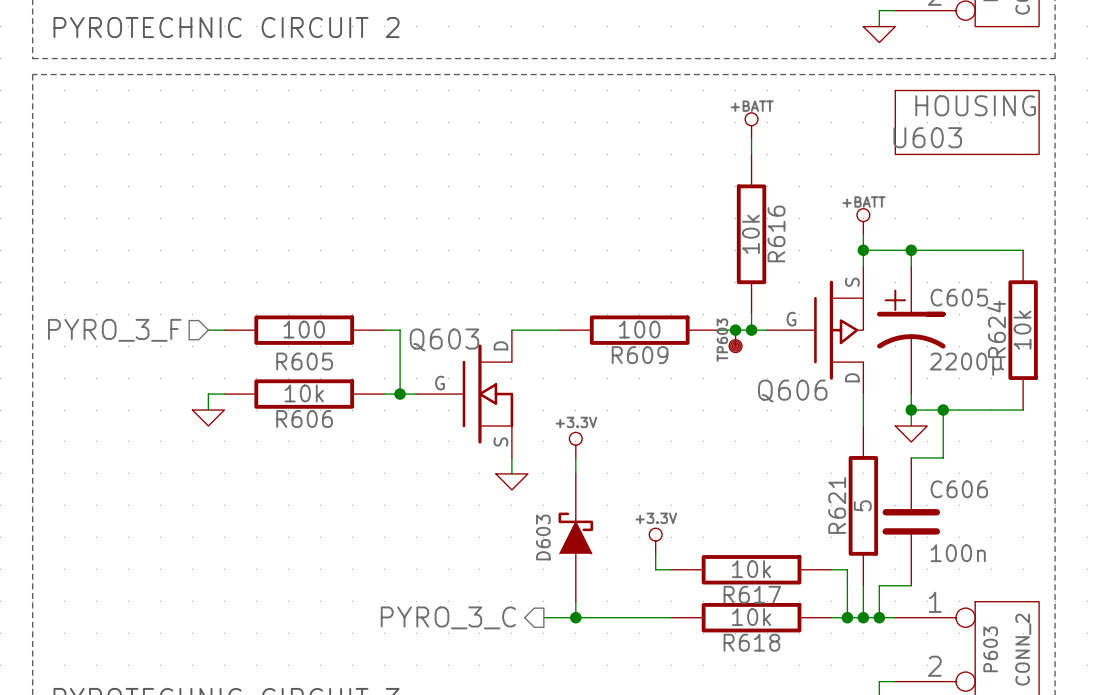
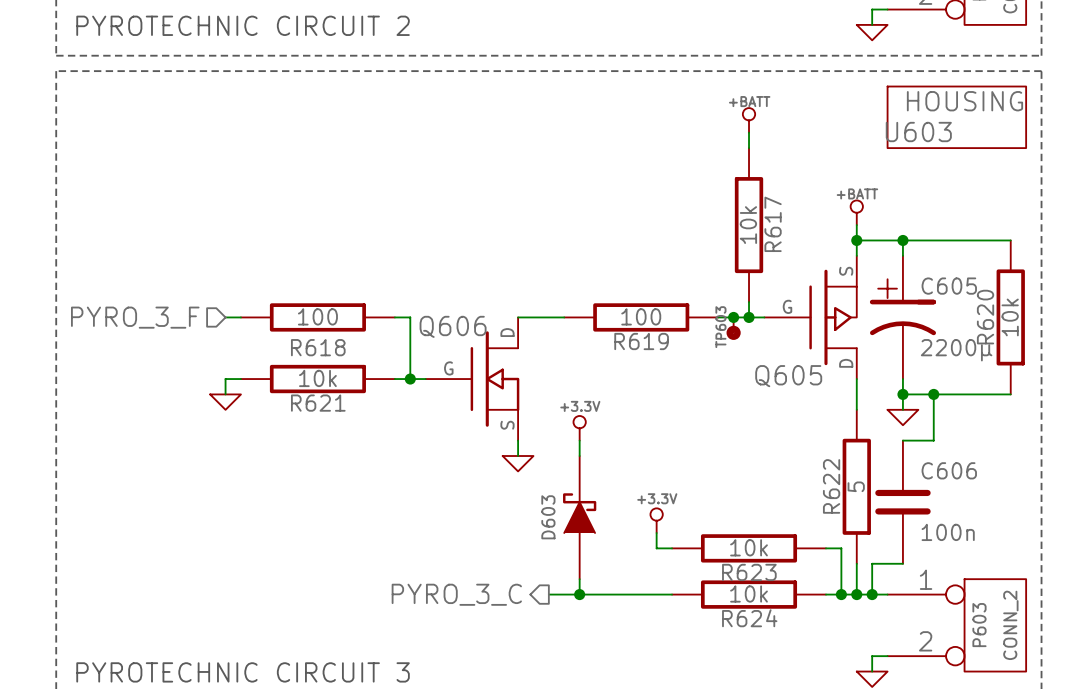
R616 name: R616 (776, 233) -> R617 (773, 224)
R624 name: R624 (996, 329) -> R620 (985, 317)
Q603 name: Q603 (444, 339) -> Q606 (453, 326)
R609 name: R609 (640, 355) -> R619 (641, 341)
R605 name: R605 (304, 361) -> R618 (318, 347)
Q606 name: Q606 (792, 391) -> Q605 (788, 376)
R606 name: R606 (304, 419) -> R621 (318, 403)
R621 name: R621 (837, 505) -> R622 (831, 486)
R617 name: R617 (752, 594) -> R623 (749, 572)
R618 name: R618 (751, 642) -> R624 (749, 618)

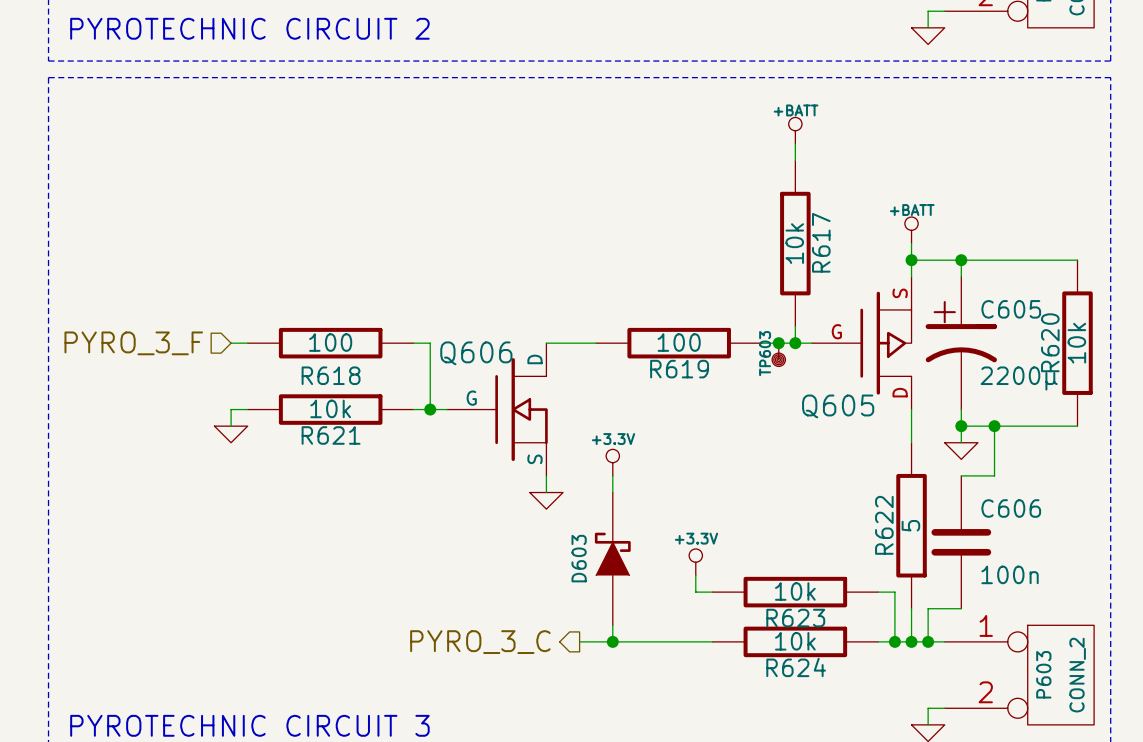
U603: HOUSING (956, 117) -> none

